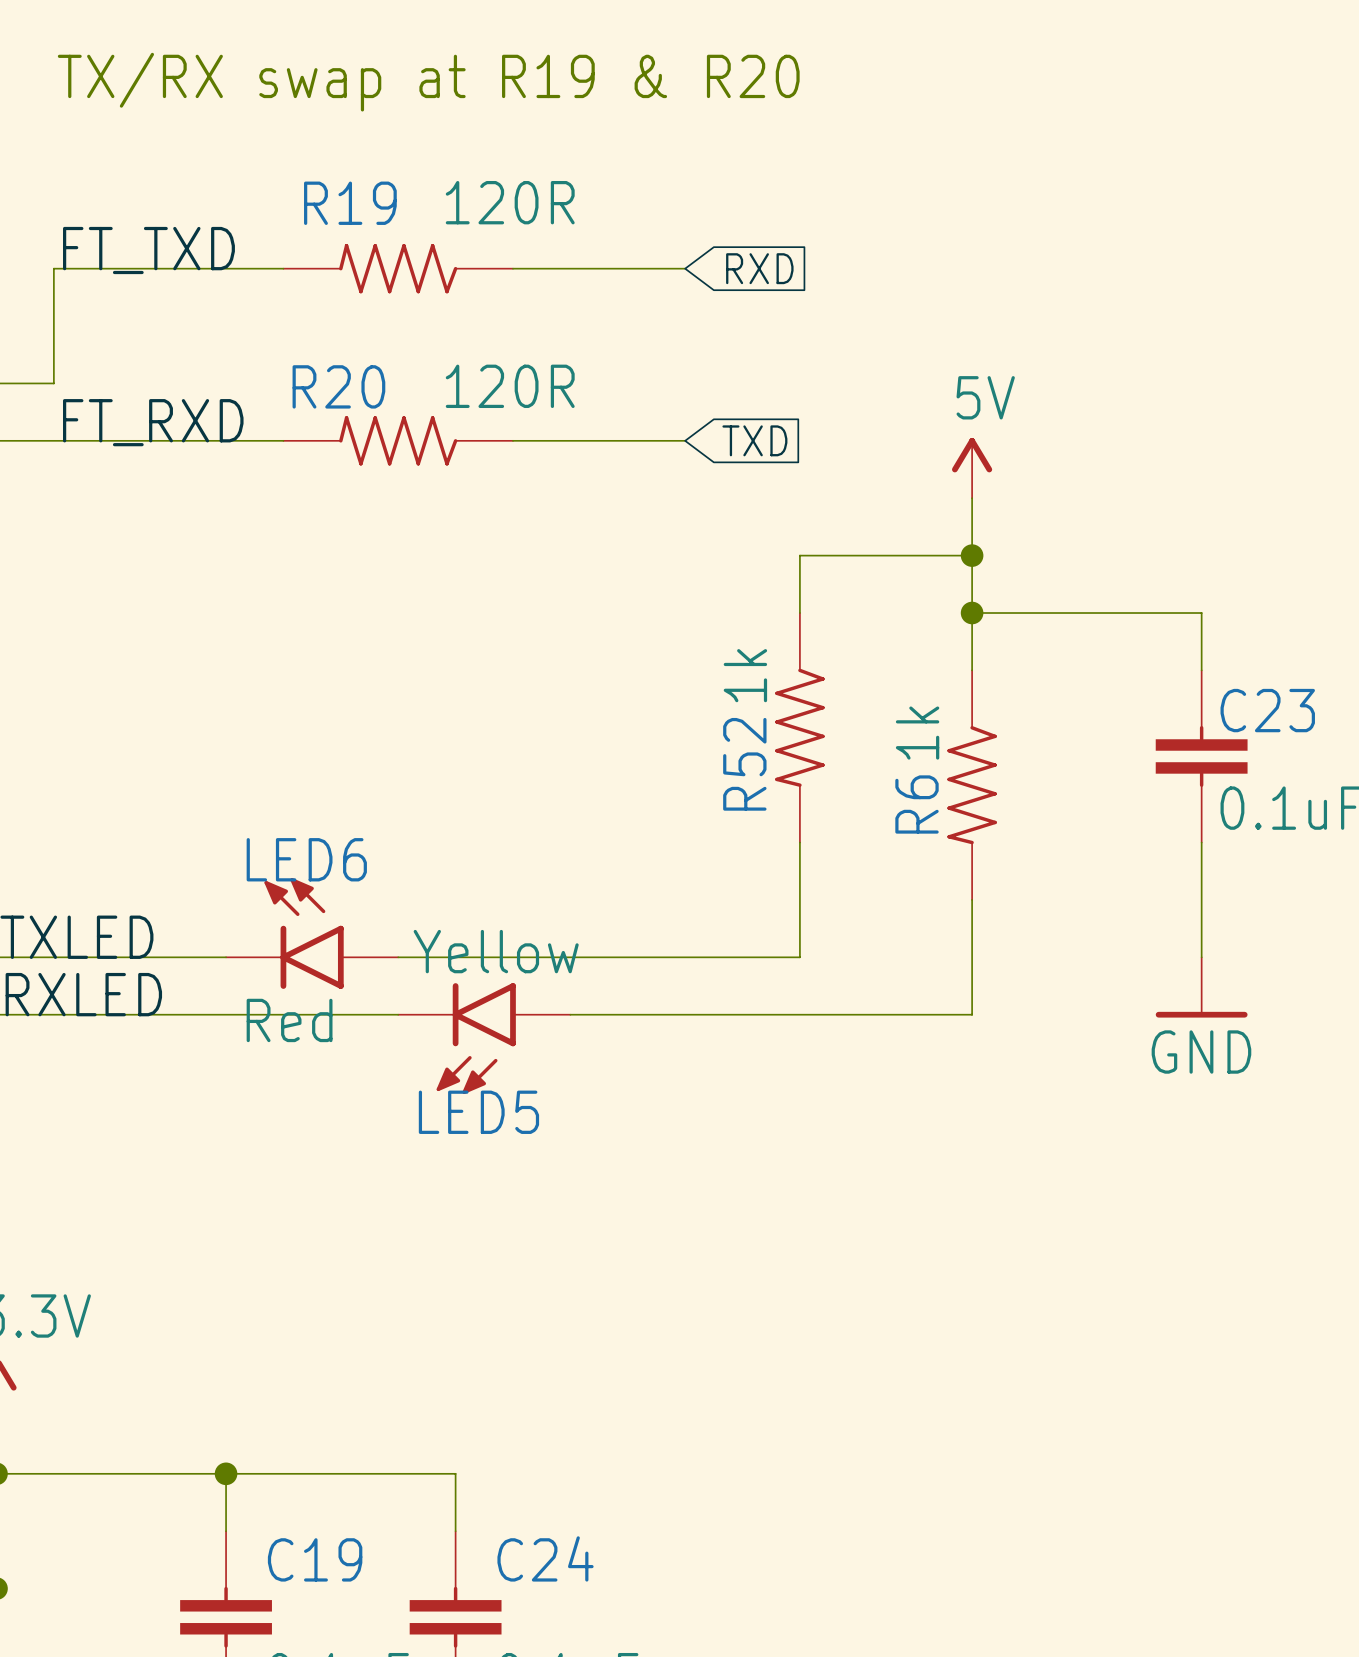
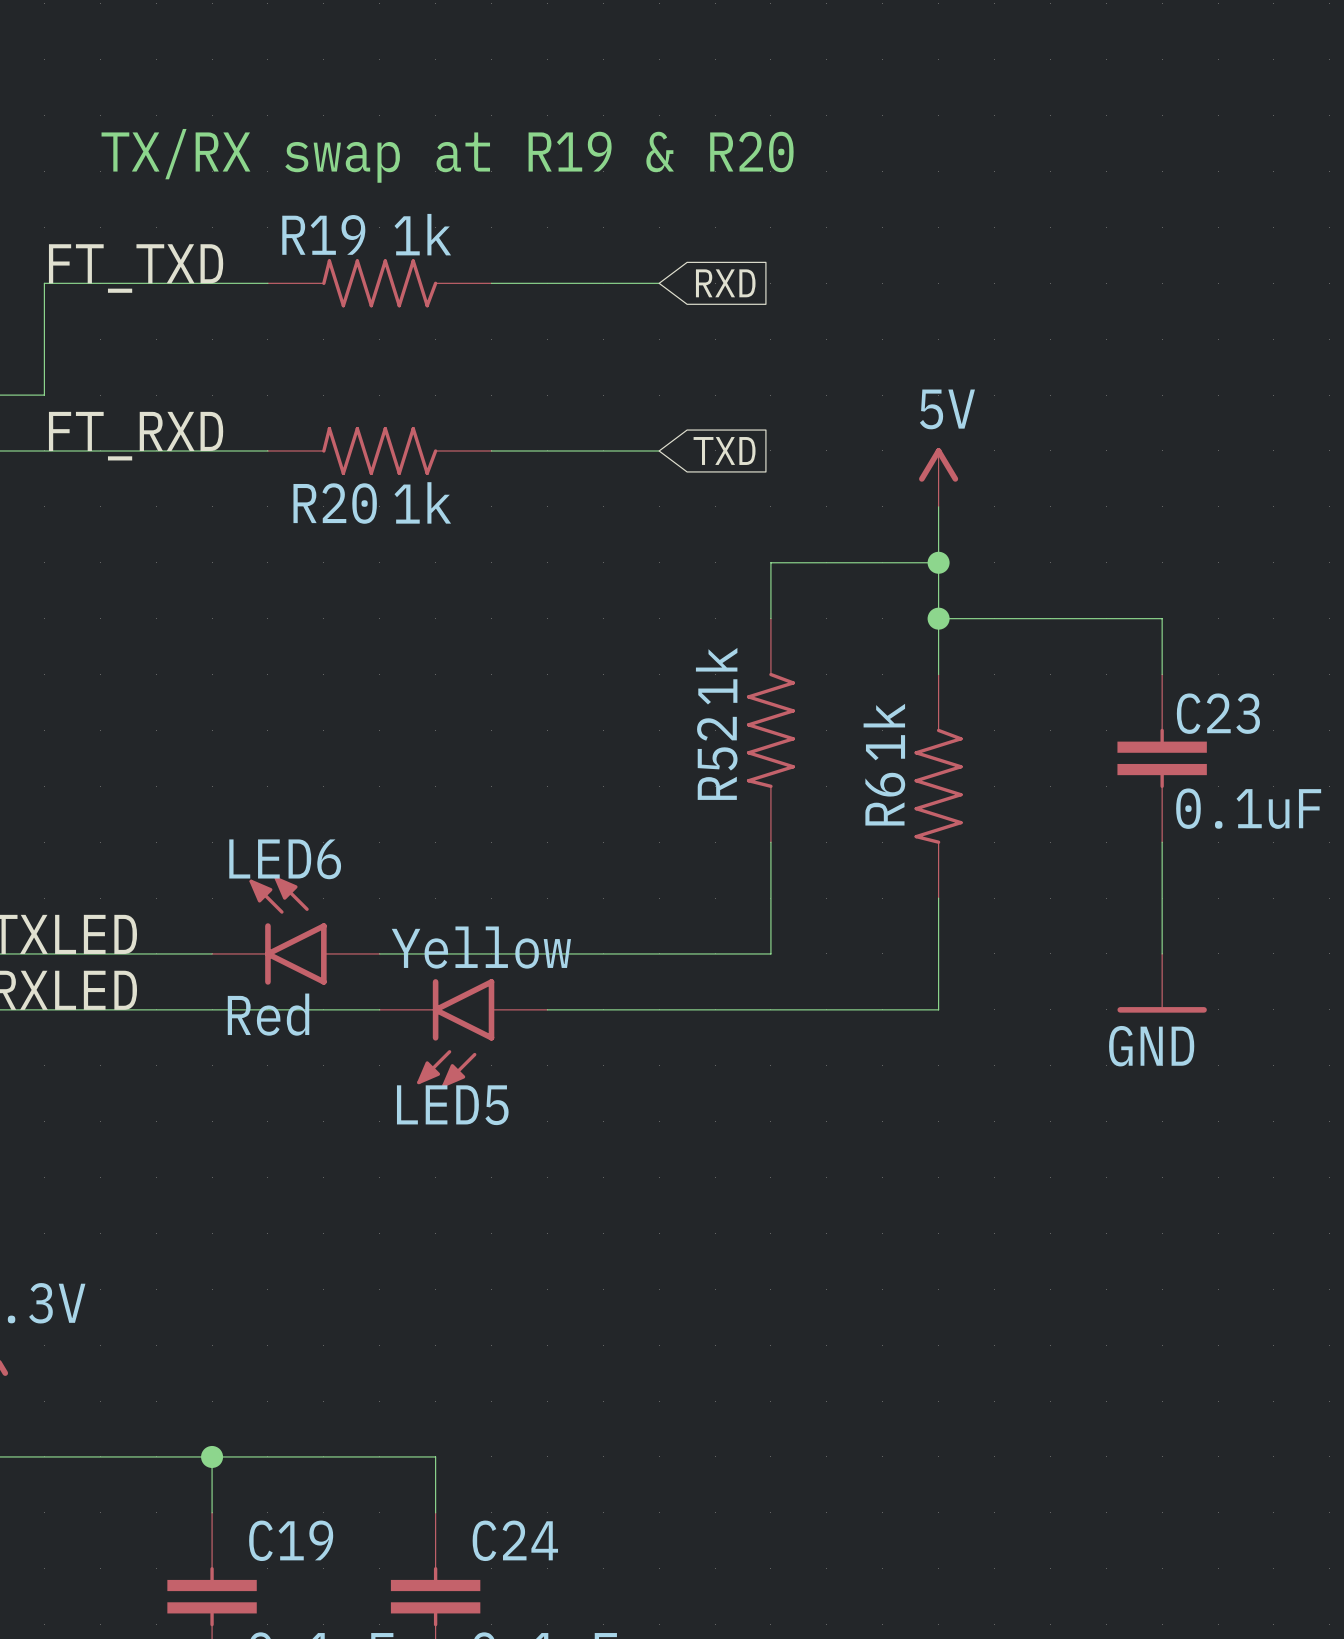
text position: TX/RX swap at R19 & R20 (428, 82) -> TX/RX swap at R19 & R20 (447, 155)
R19 value: 120R (510, 202) -> 1k (422, 234)
R19 name position: R19 (350, 203) -> R19 (323, 234)
R20 name position: R20 (338, 386) -> R20 (335, 503)
R20 value: 120R (510, 386) -> 1k (422, 502)

